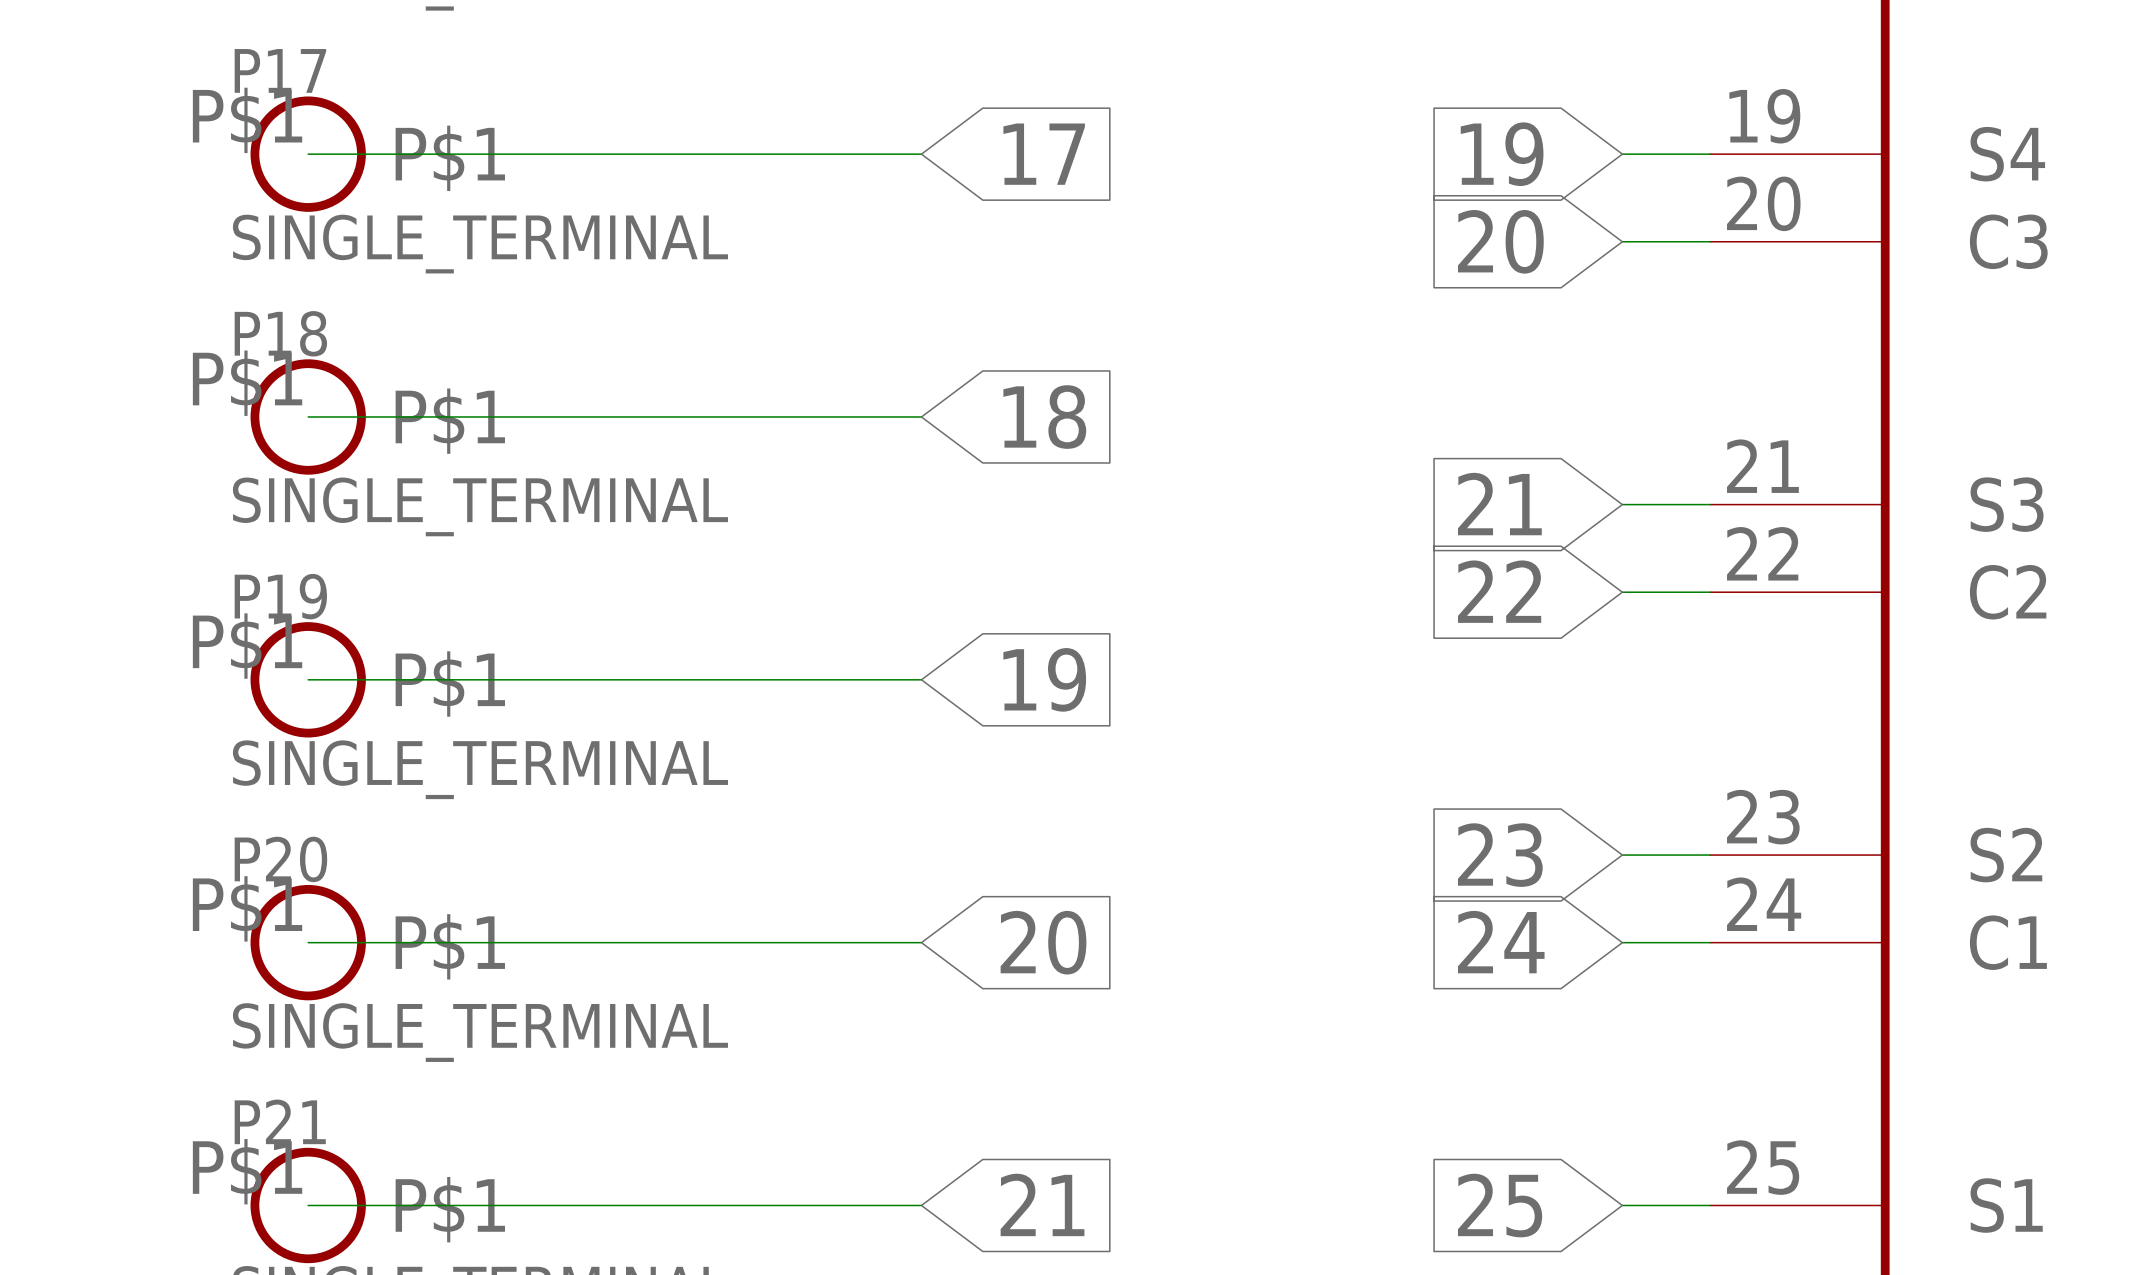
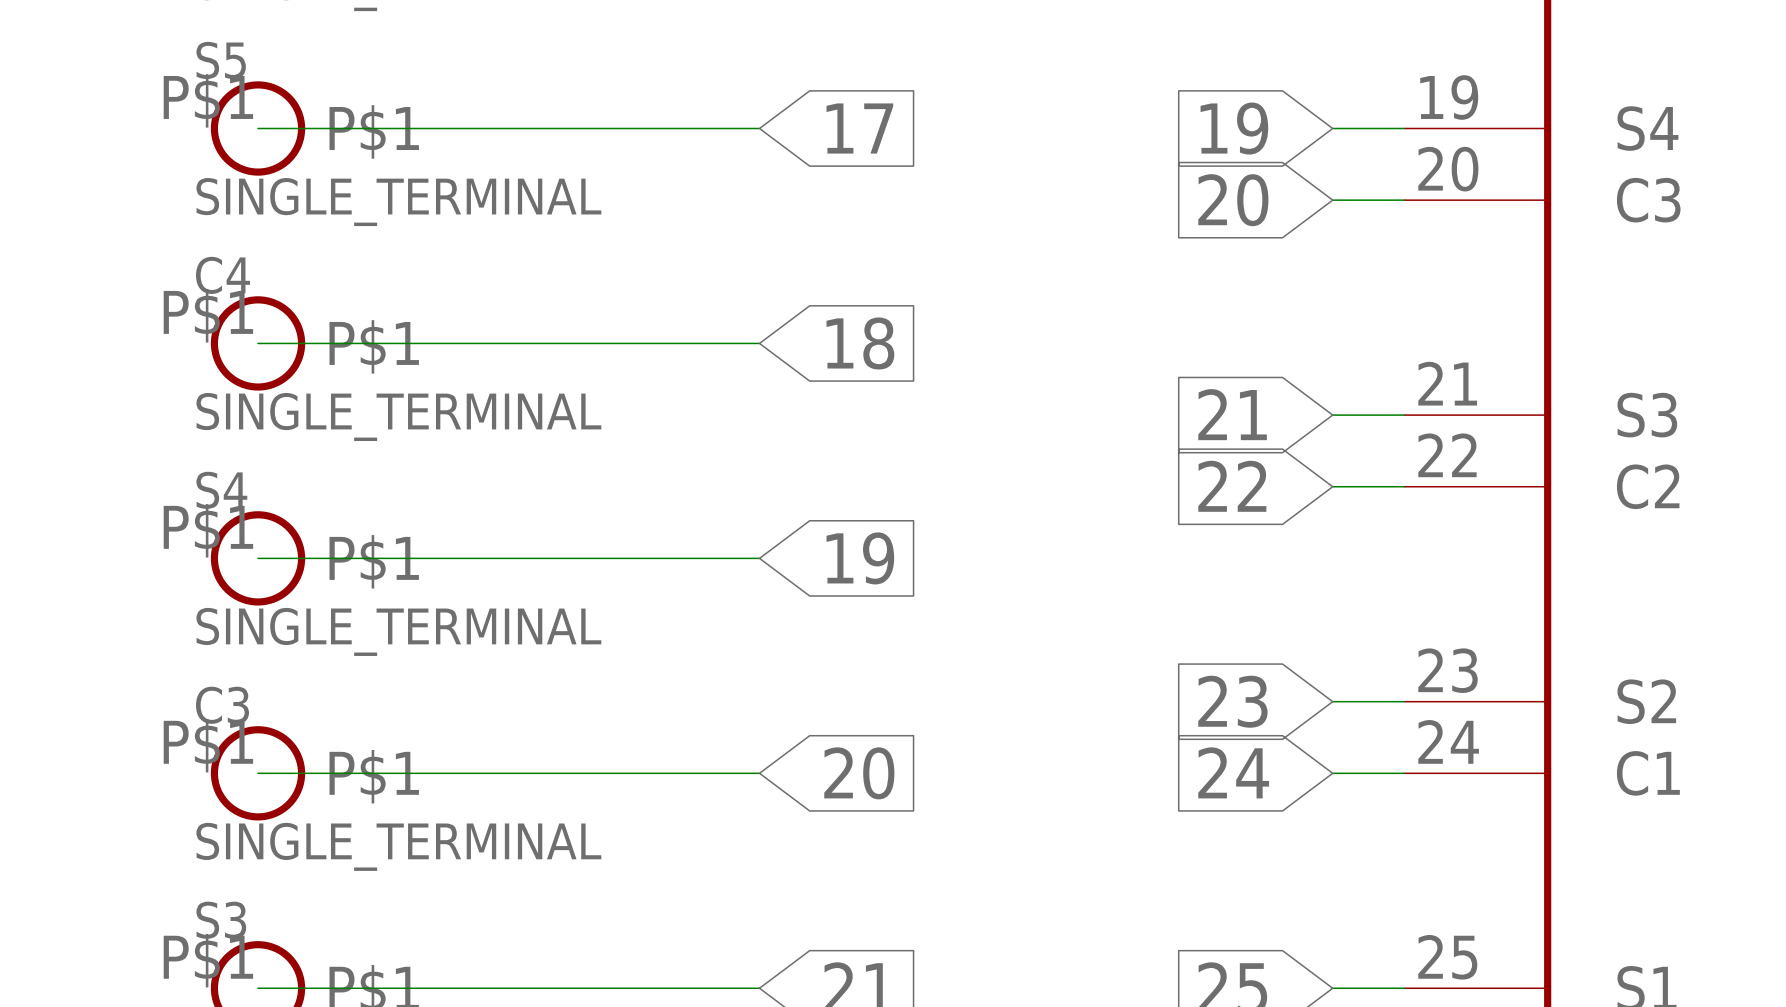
P17 name: P17 (280, 70) -> S5 (221, 60)
P18 name: P18 (280, 333) -> C4 (223, 275)
P19 name: P19 (280, 596) -> S4 (221, 490)
P20 name: P20 (280, 859) -> C3 (222, 705)
P21 name: P21 (280, 1121) -> S3 (221, 920)

